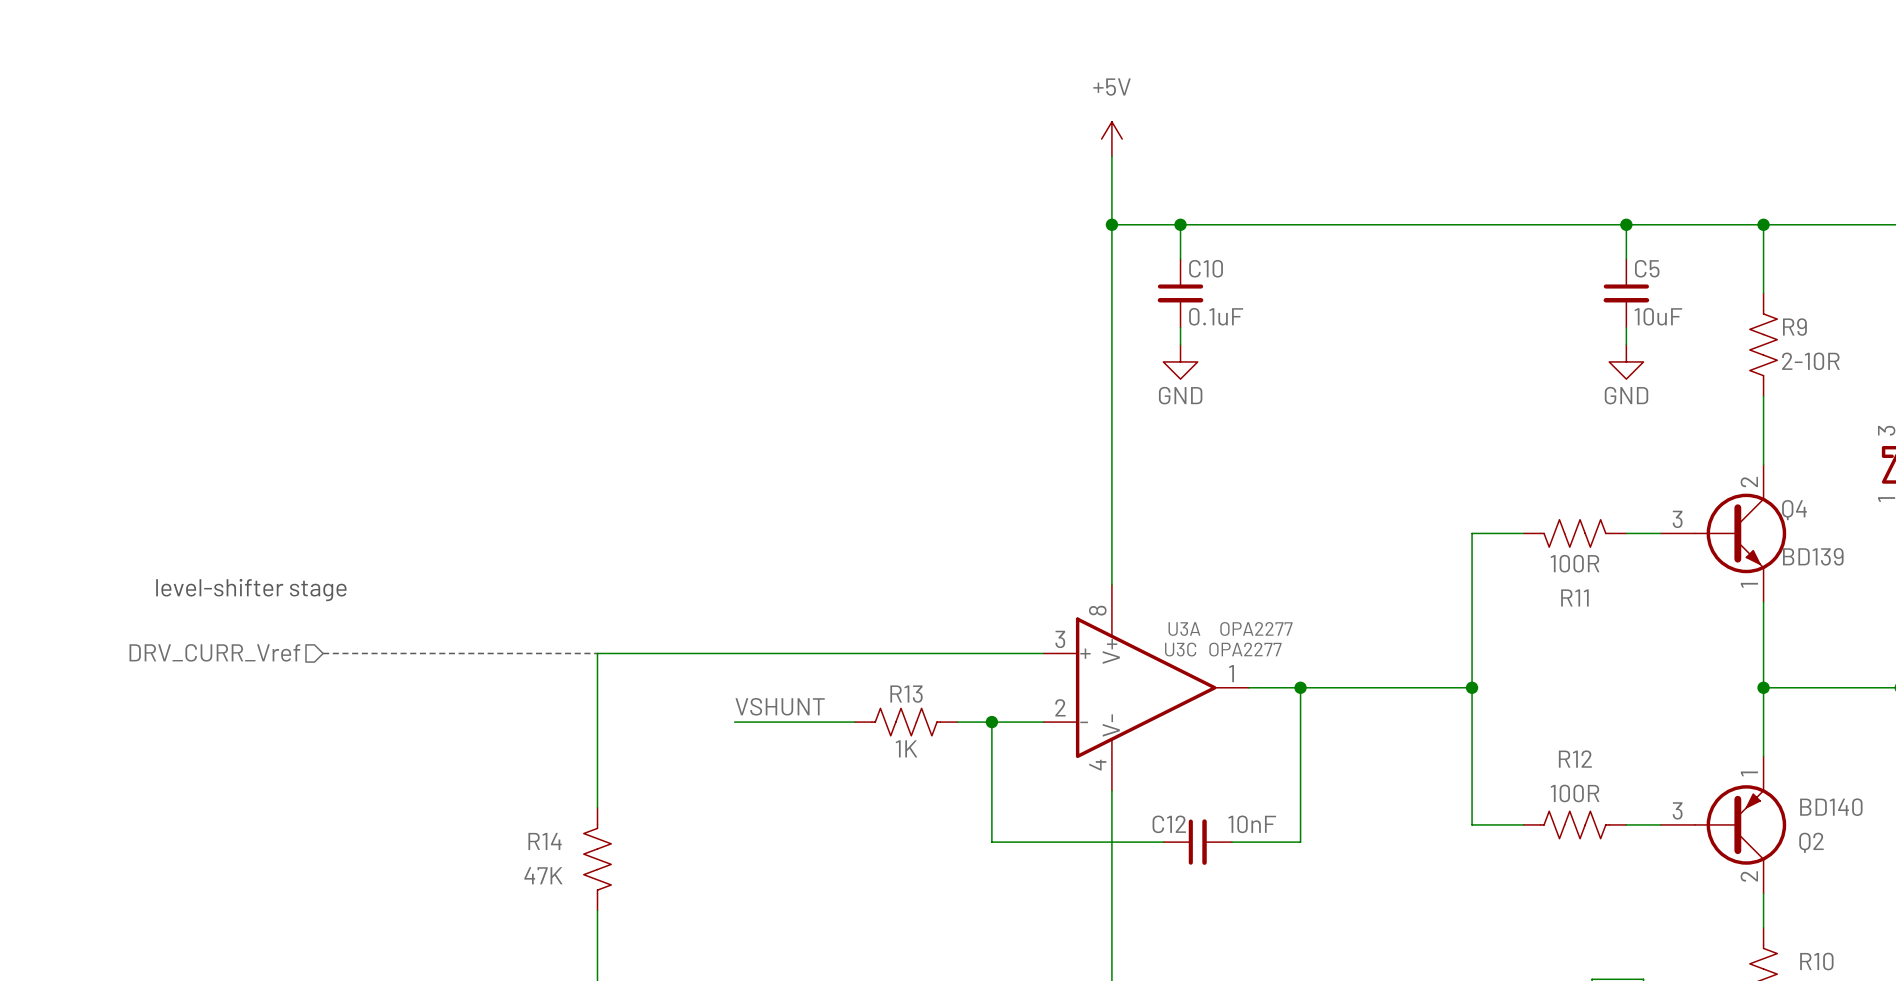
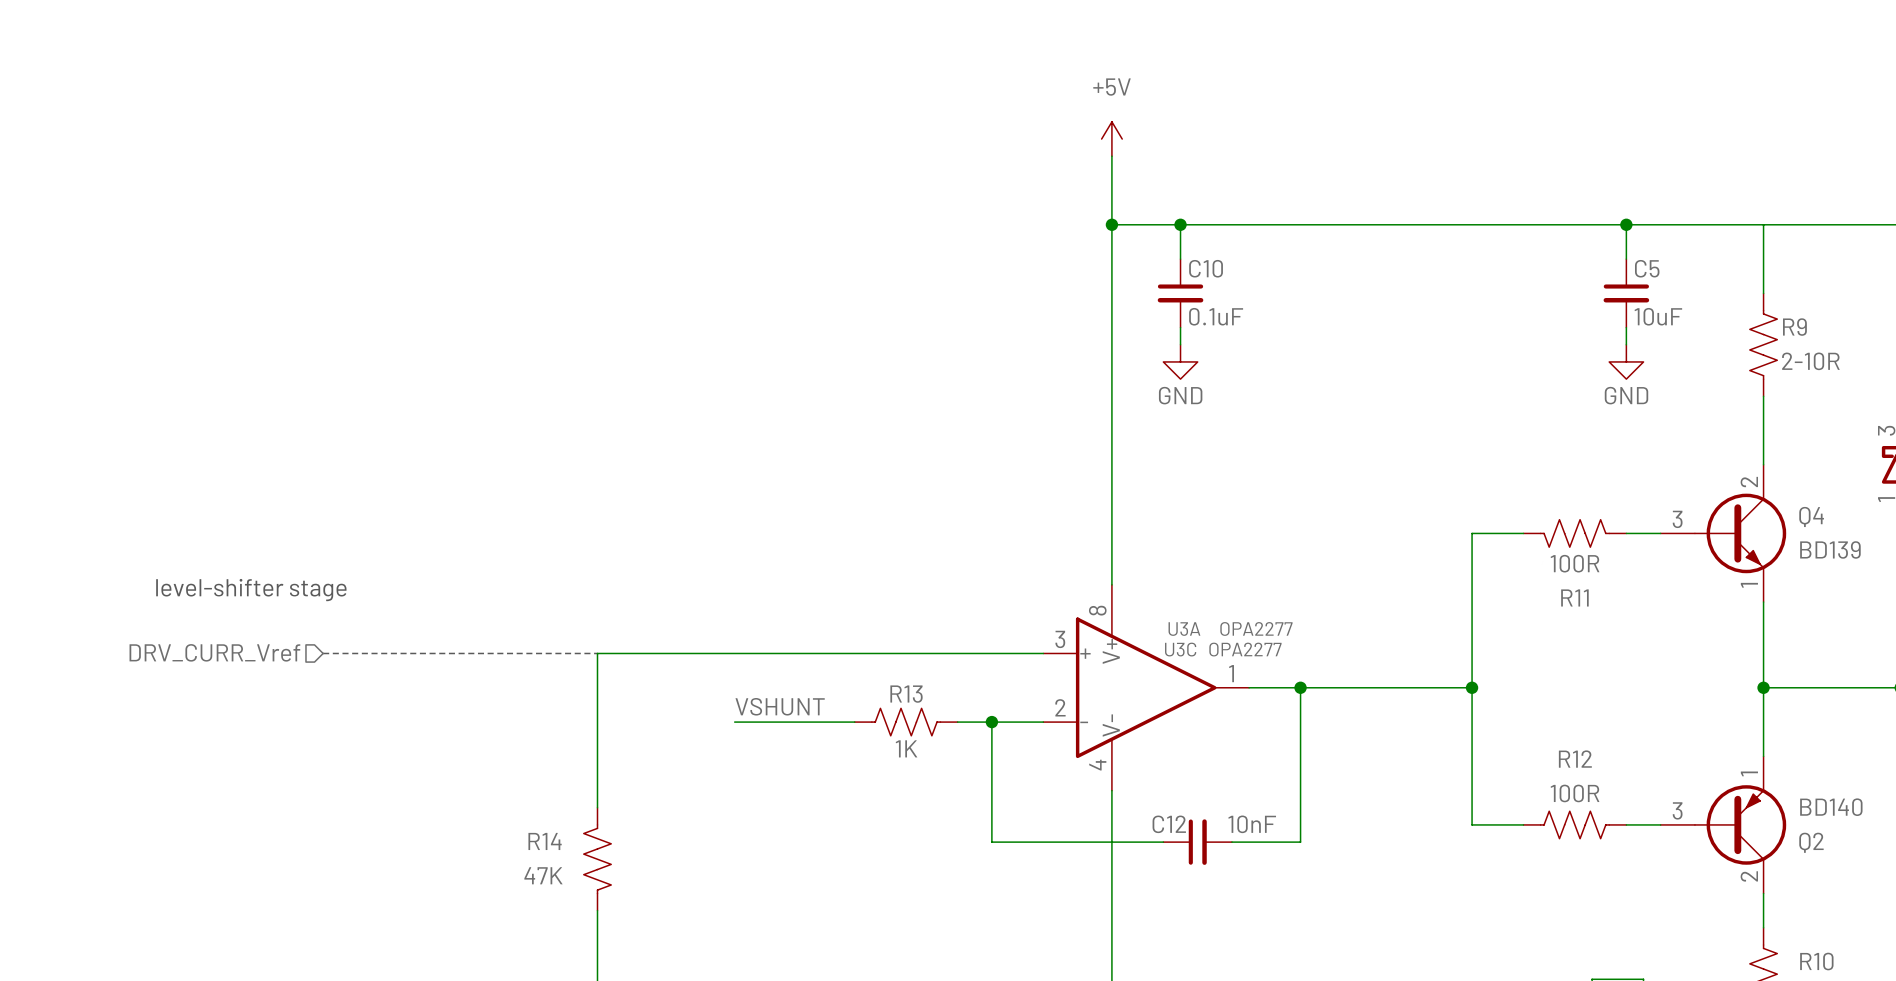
junction: (1763, 224) -> none
Q4 name position: Q4 (1794, 510) -> Q4 (1811, 516)
Q4 value position: BD139 (1813, 556) -> BD139 (1830, 549)

